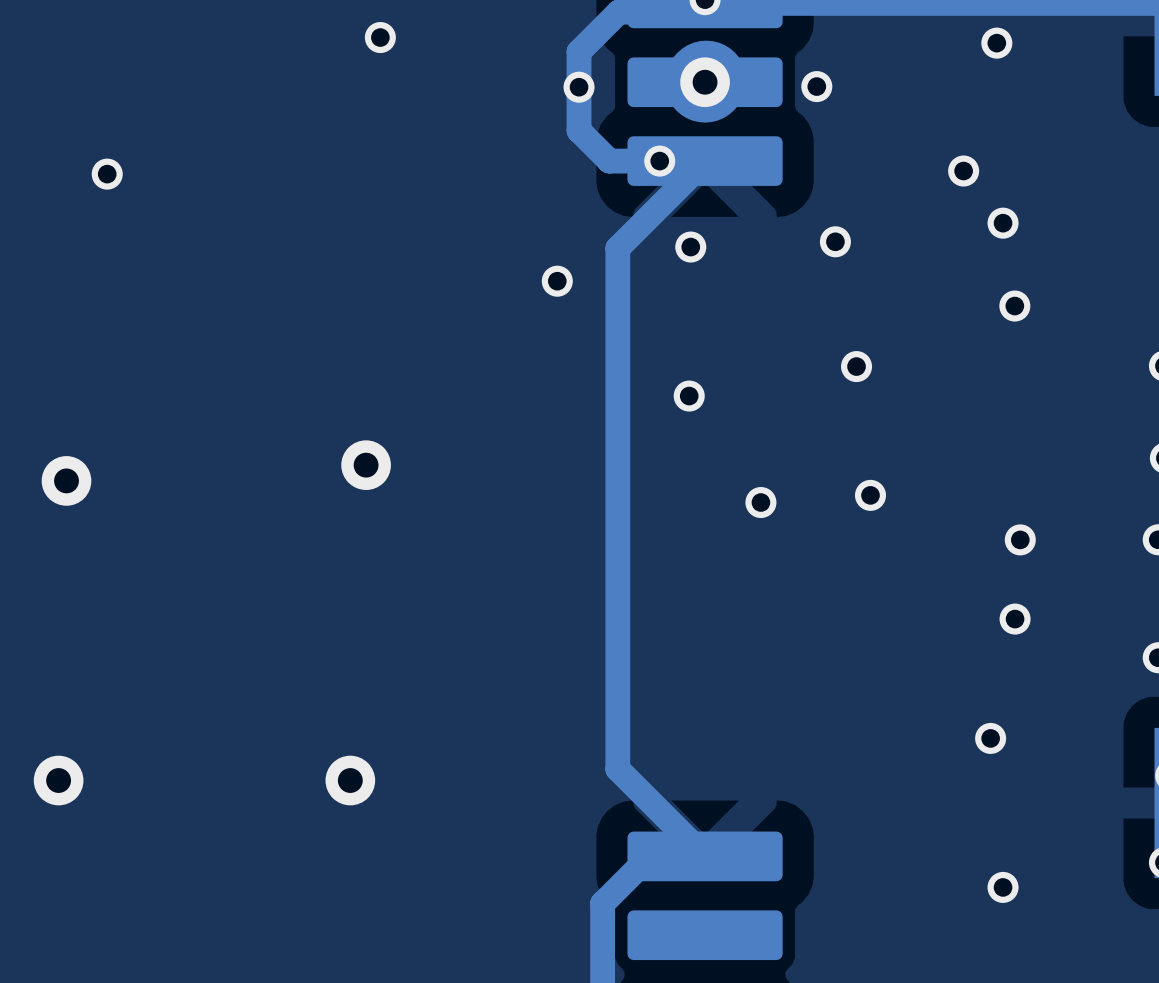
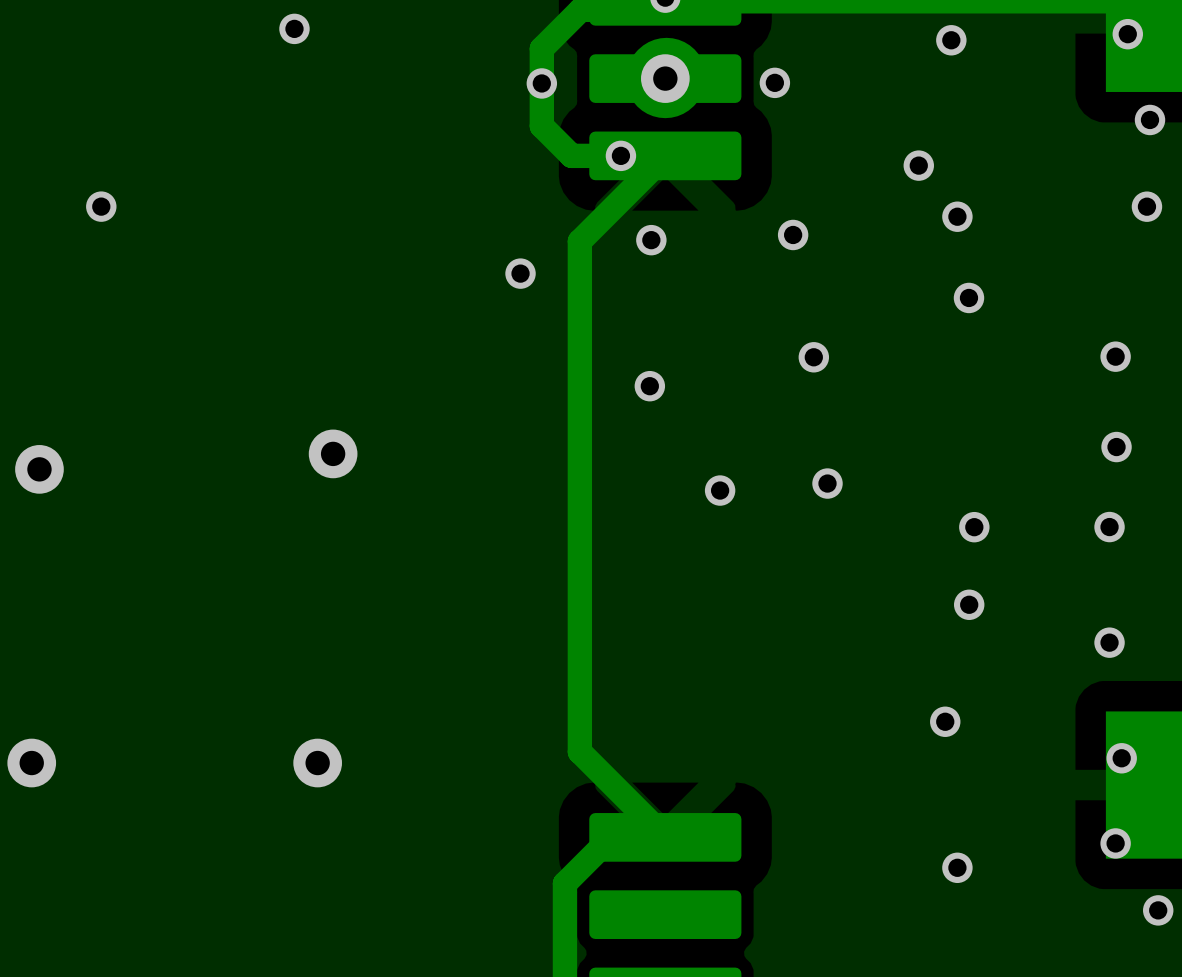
via position: (380, 37) -> (294, 28)
via position: (107, 174) -> (101, 206)

